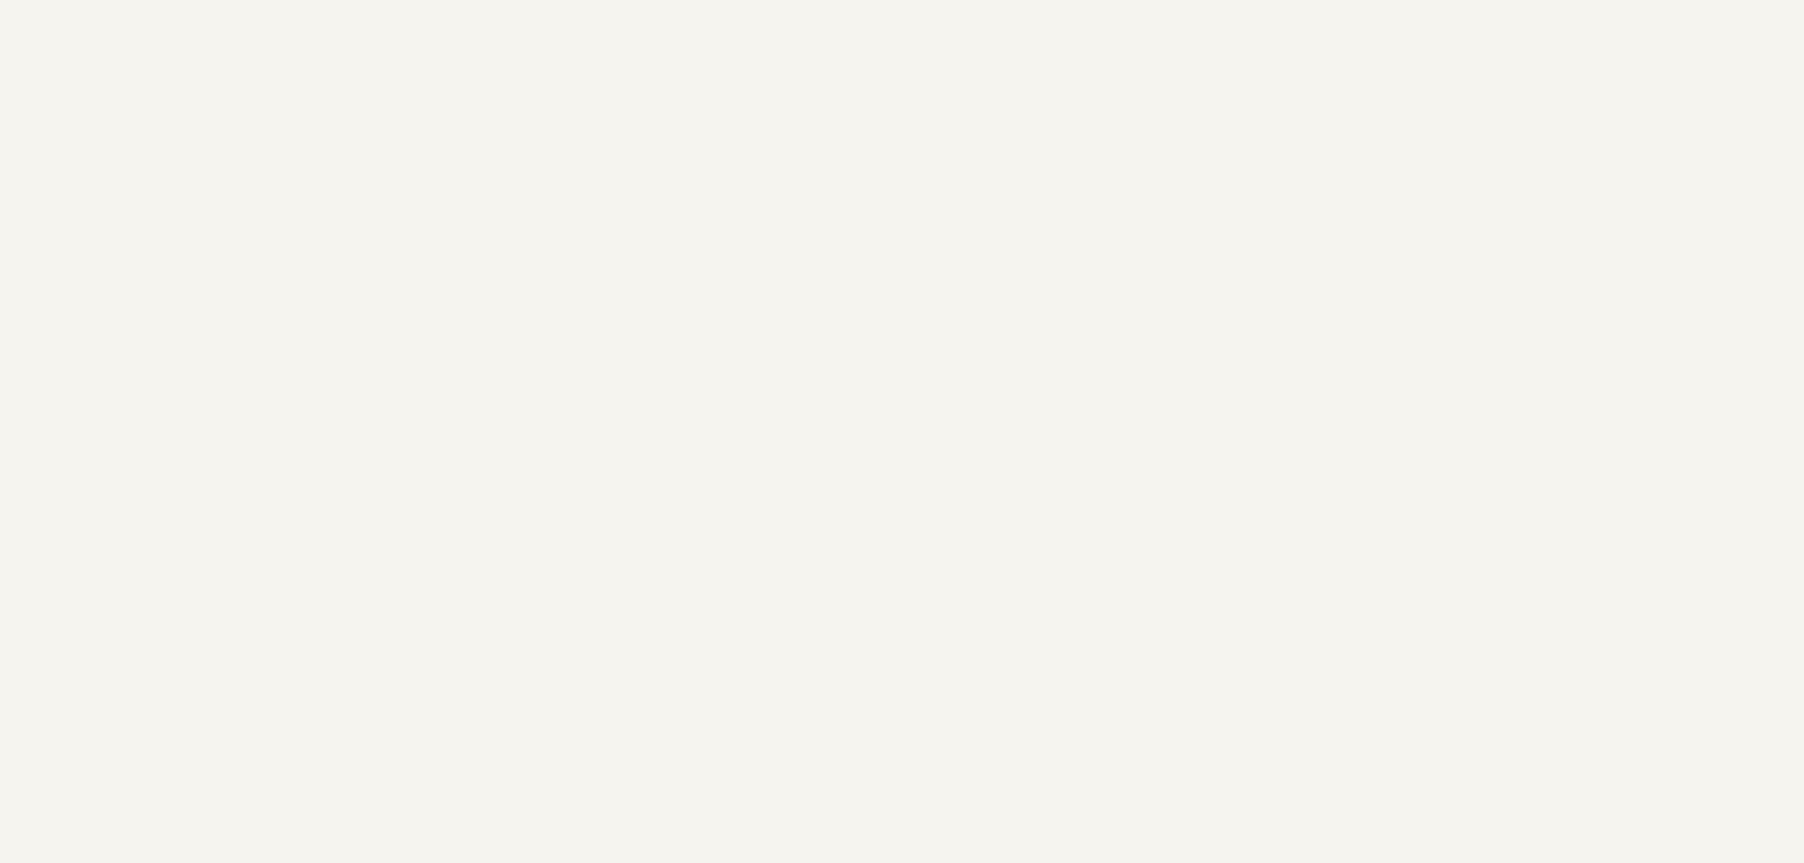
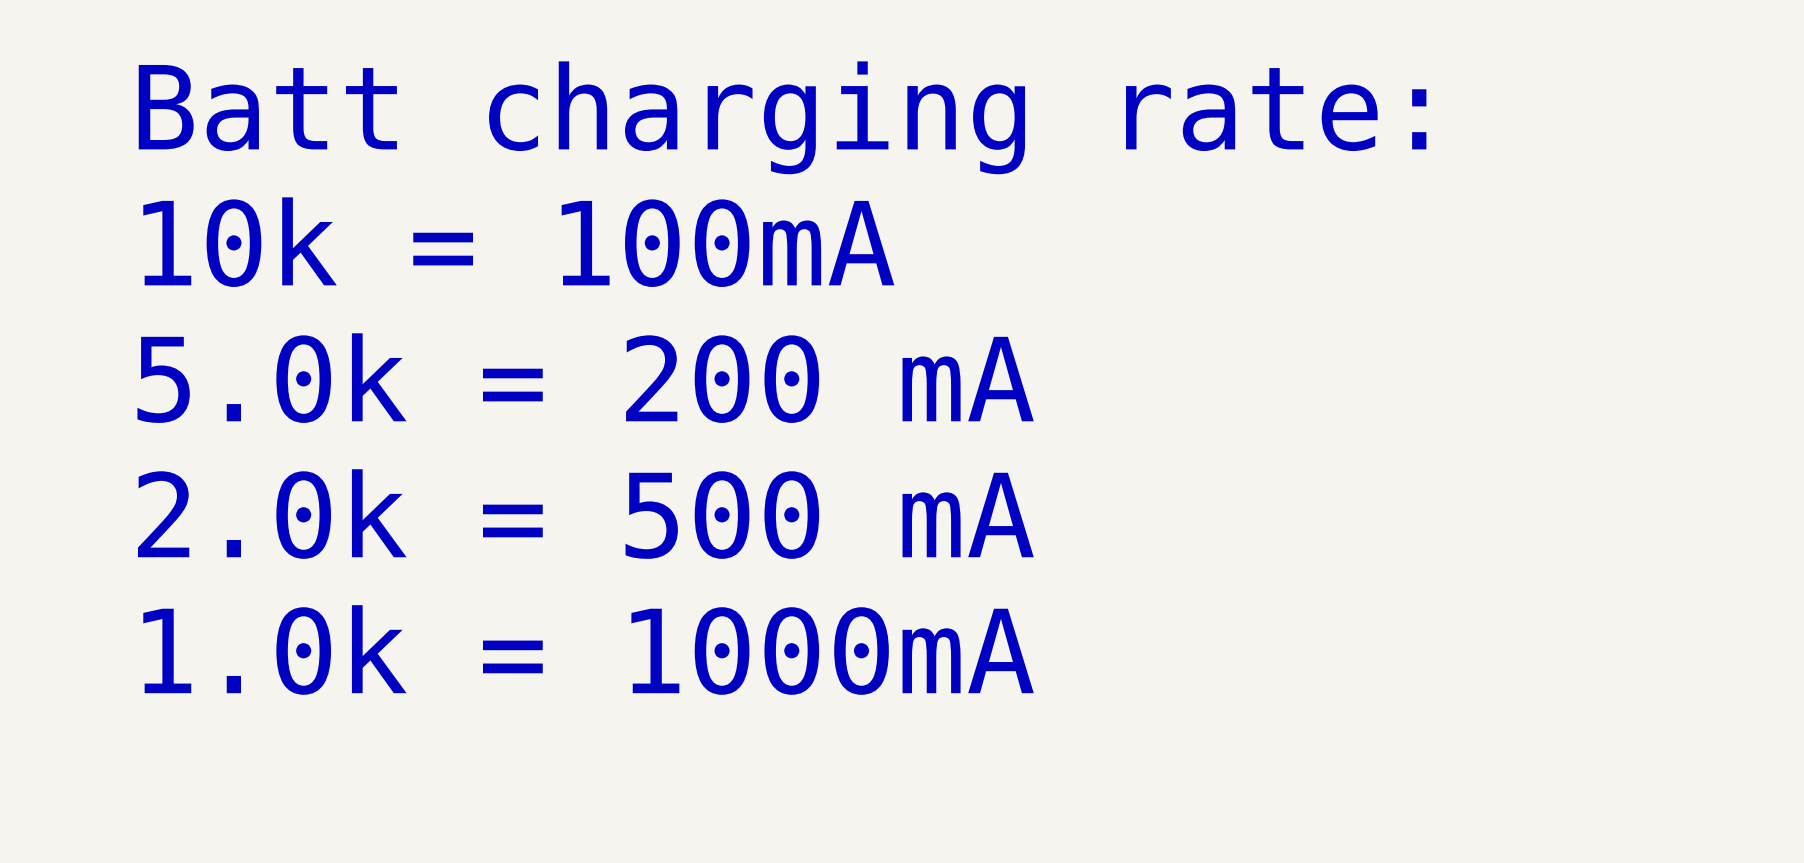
text: none -> Batt charging rate: (782, 117)
text: none -> 10k = 100mA (518, 242)
text: none -> 5.0k = 200 mA (585, 378)
text: none -> 2.0k = 500 mA (585, 514)
text: none -> 1.0k = 1000mA (588, 649)

